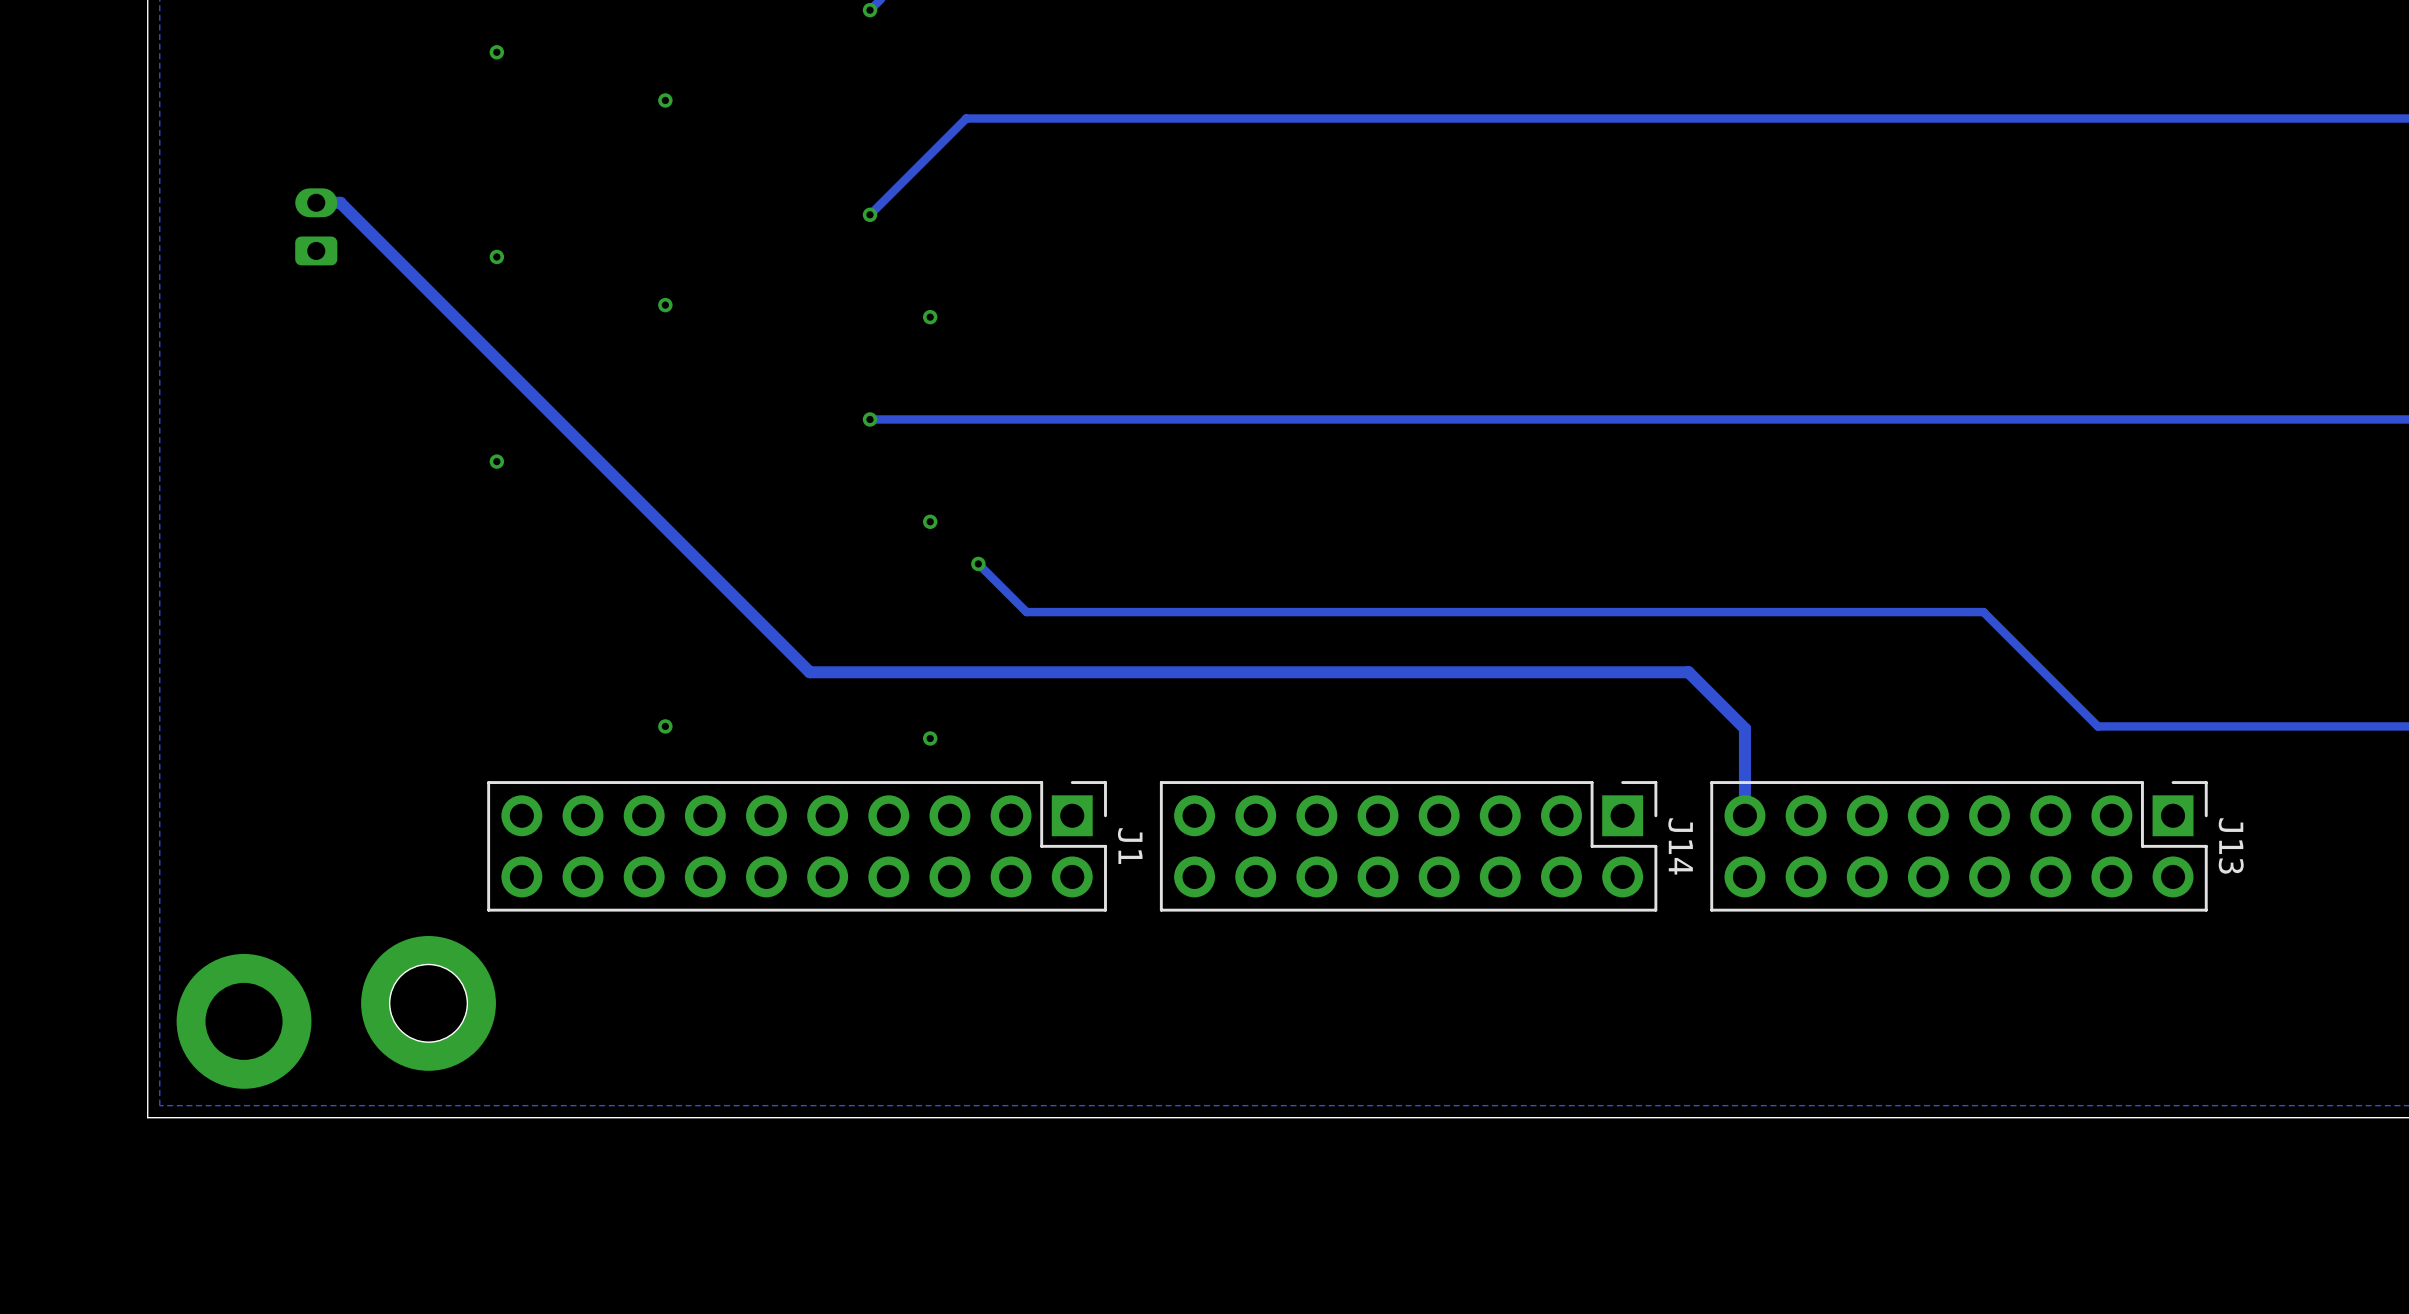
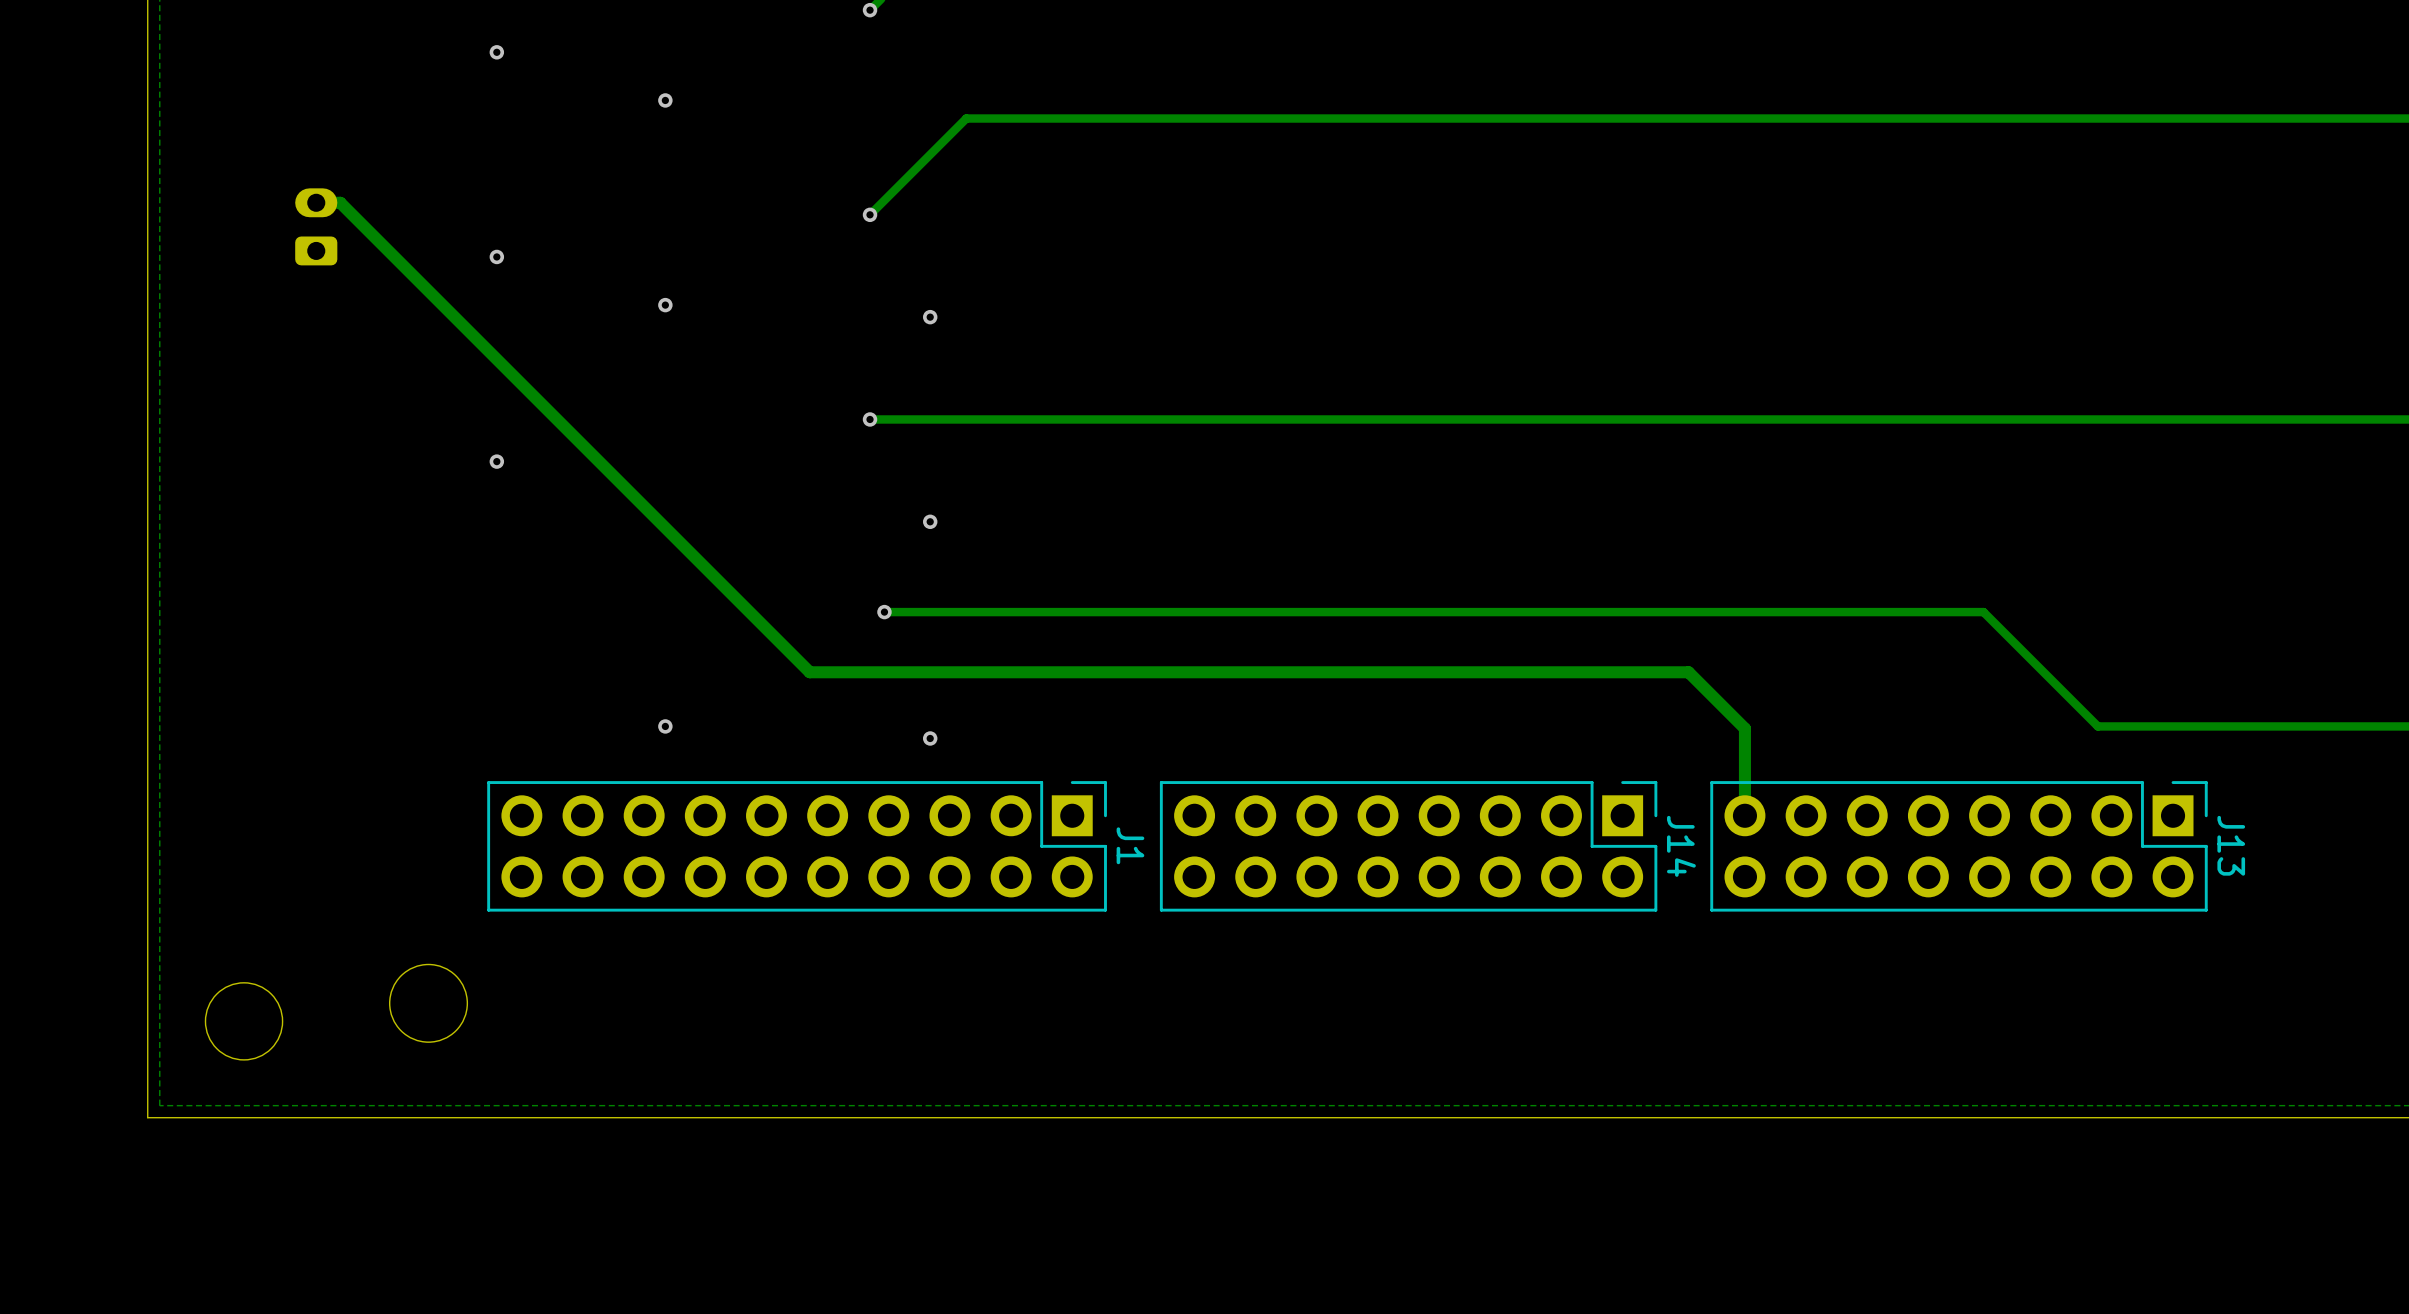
track: (978, 563) (1026, 612) -> (884, 612) (1026, 612)
via position: (978, 563) -> (884, 612)
round board edge: none -> [204, 982, 284, 1061]
part: (428, 1003) -> none
part: (244, 1021) -> none

